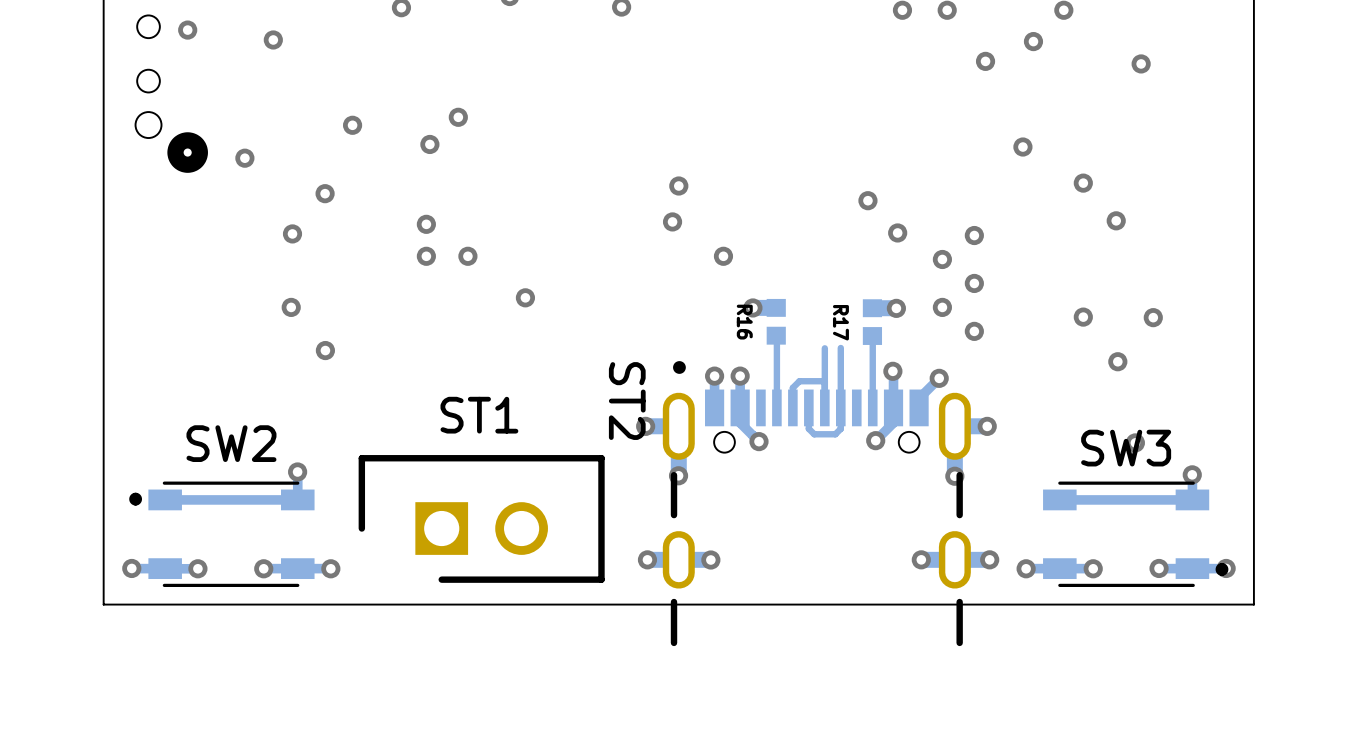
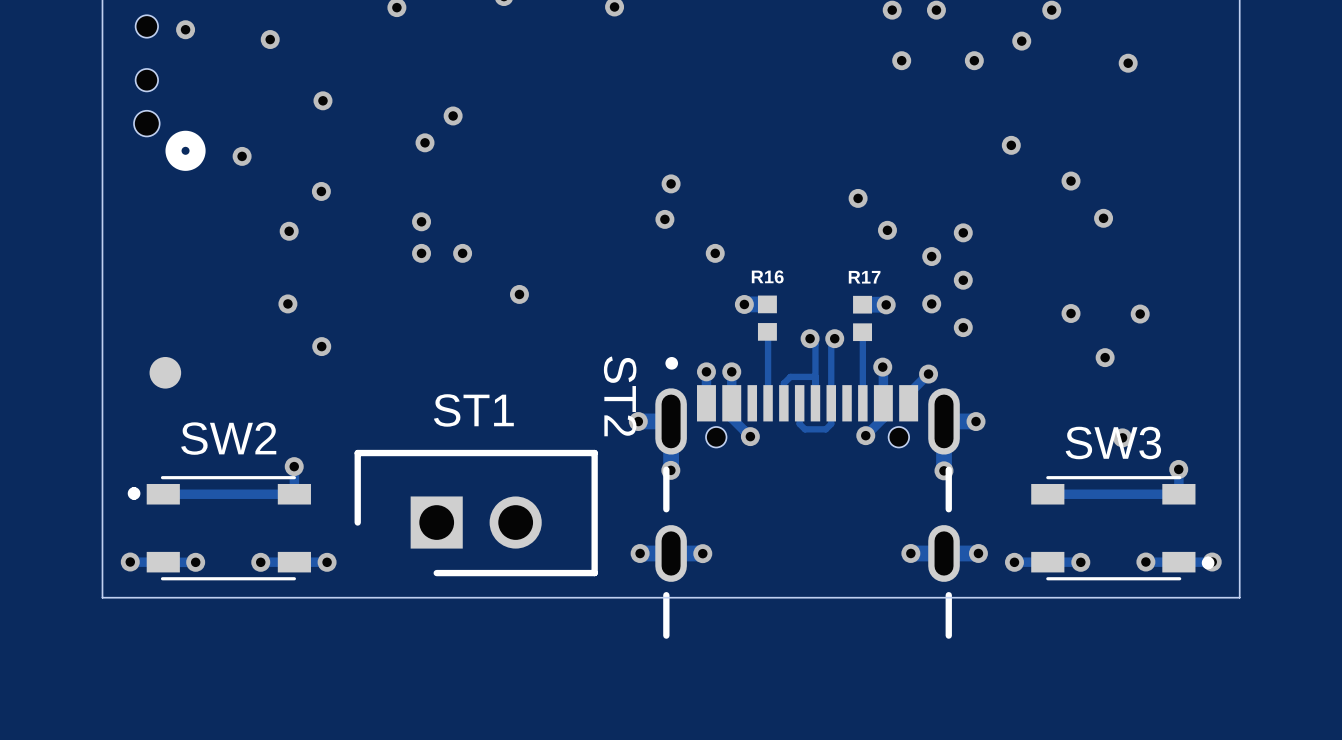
via: none -> (901, 60)
via position: (352, 125) -> (322, 100)
R16 name rotation: 0° (744, 322) -> 90° counterclockwise (767, 276)
R16 name position: R16 (744, 322) -> R16 (767, 276)
R17 name rotation: 0° (840, 322) -> 90° counterclockwise (864, 277)
R17 name position: R17 (840, 322) -> R17 (864, 277)
via: none -> (810, 338)
via: none -> (834, 338)
part: none -> (165, 372)

